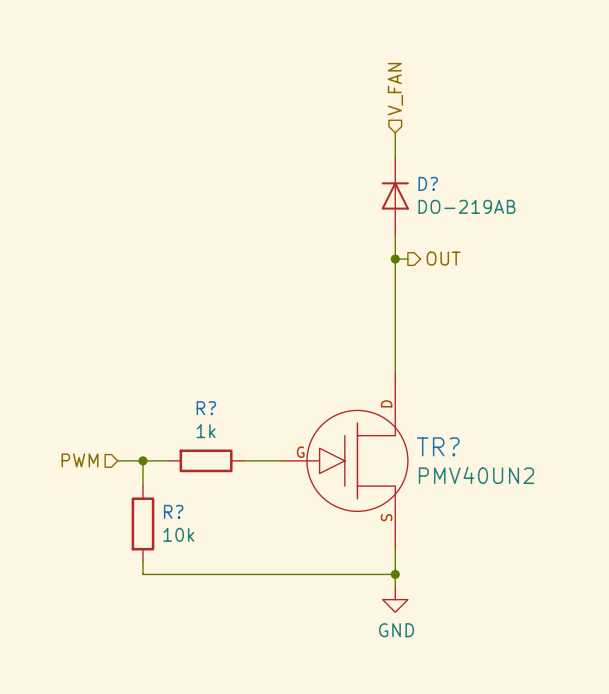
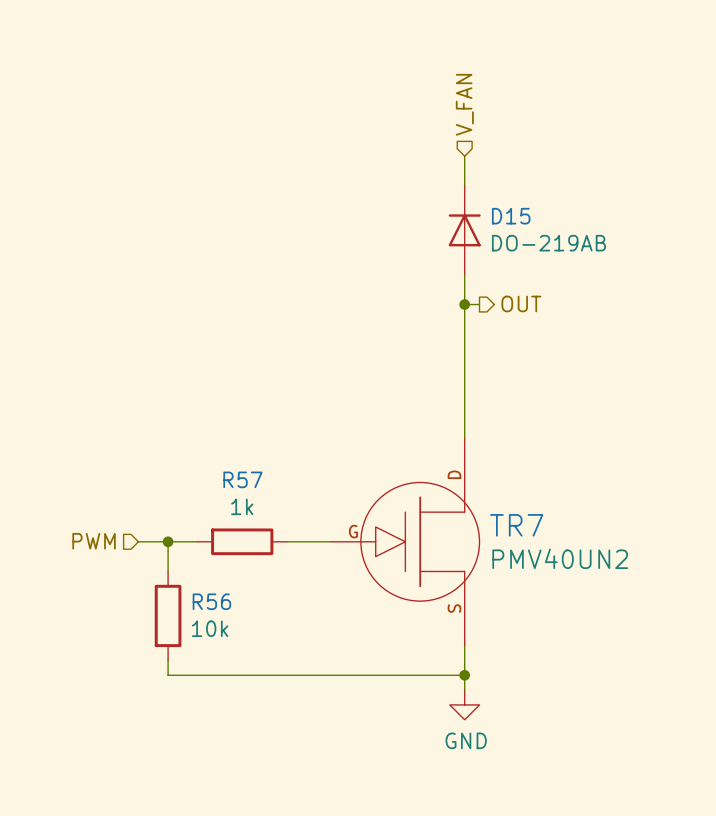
D? name: D? (428, 183) -> D15 (511, 216)
R? name: R? (206, 408) -> R57 (242, 479)
TR? name: TR? (438, 446) -> TR7 (516, 525)
R? name: R? (173, 511) -> R56 (211, 601)

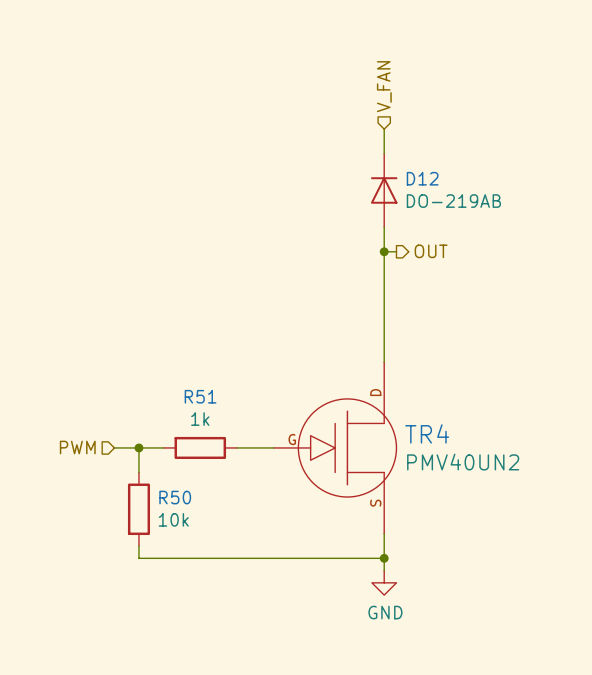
D15 name: D15 (511, 216) -> D12 (422, 178)
R57 name: R57 (242, 479) -> R51 (200, 396)
TR7 name: TR7 (516, 525) -> TR4 (427, 433)
R56 name: R56 (211, 601) -> R50 (175, 497)

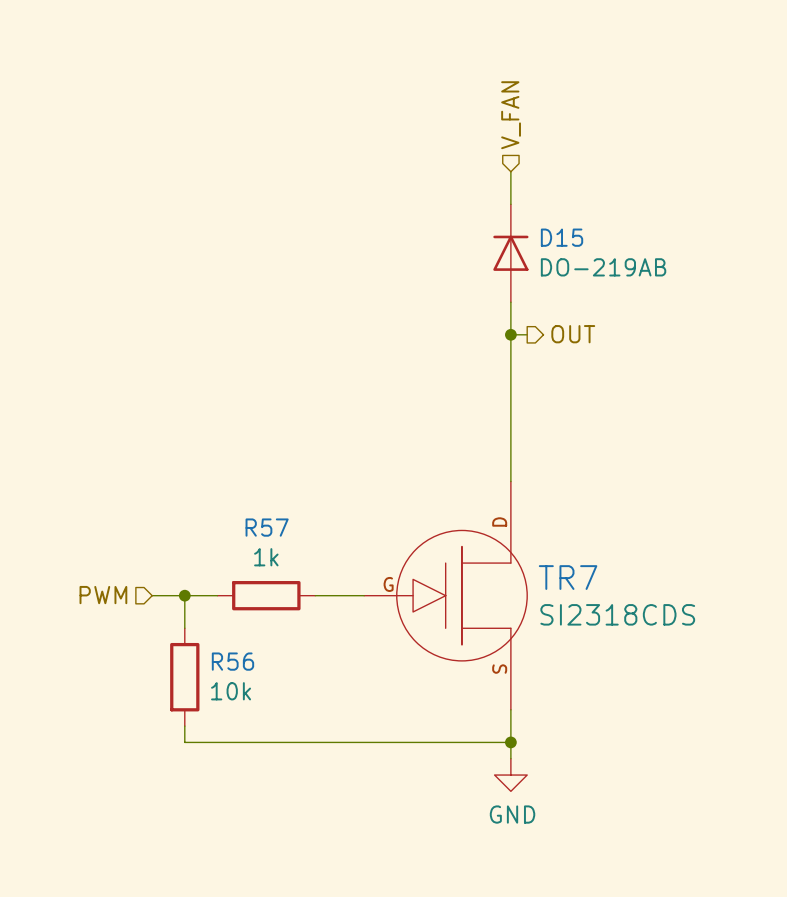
D12 name: D12 (422, 178) -> D15 (562, 237)
R51 name: R51 (200, 396) -> R57 (267, 527)
TR4 name: TR4 (427, 433) -> TR7 (568, 577)
TR4 value: PMV40UN2 (463, 462) -> SI2318CDS (617, 614)
R50 name: R50 (175, 497) -> R56 (232, 661)

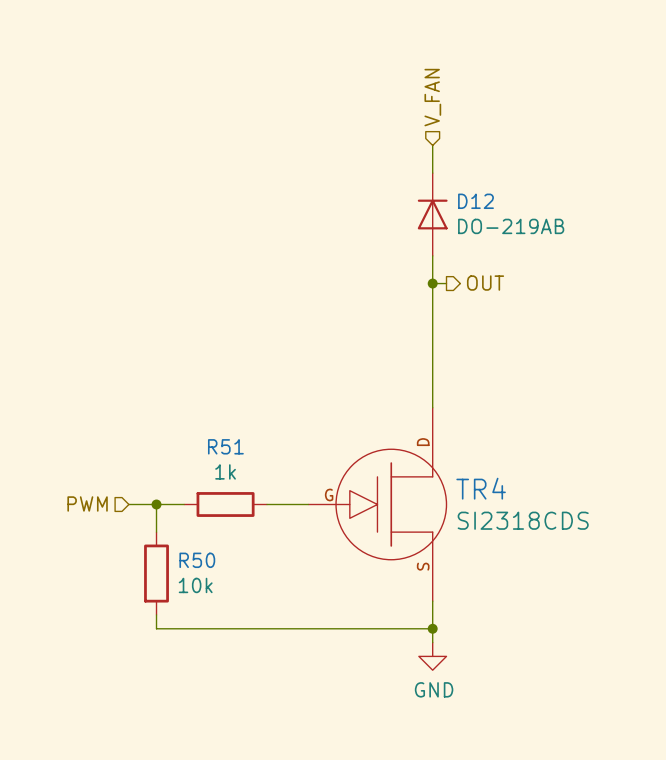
D15 name: D15 (562, 237) -> D12 (475, 201)
R57 name: R57 (267, 527) -> R51 (225, 446)
TR7 name: TR7 (568, 577) -> TR4 (481, 488)
R56 name: R56 (232, 661) -> R50 (197, 560)

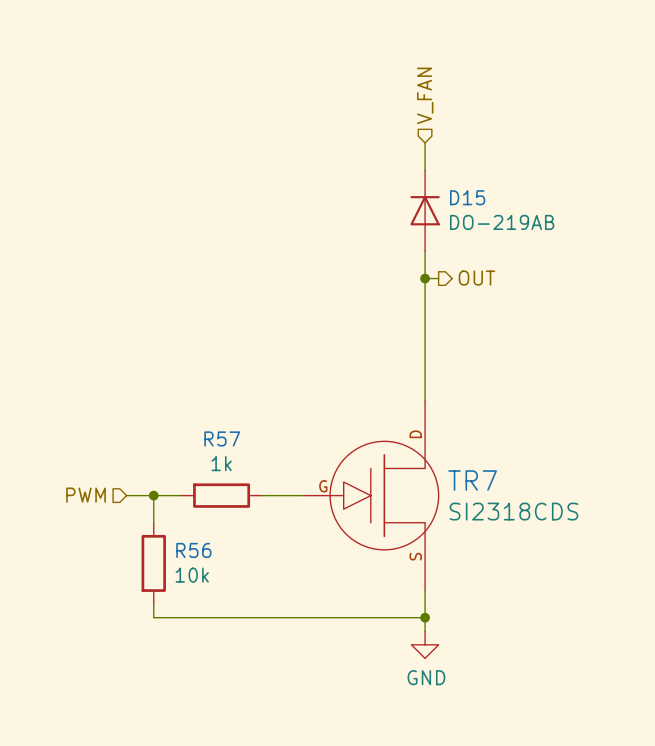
D12 name: D12 (475, 201) -> D15 (467, 197)
R51 name: R51 (225, 446) -> R57 (222, 438)
TR4 name: TR4 (481, 488) -> TR7 (472, 480)
R50 name: R50 (197, 560) -> R56 (193, 550)

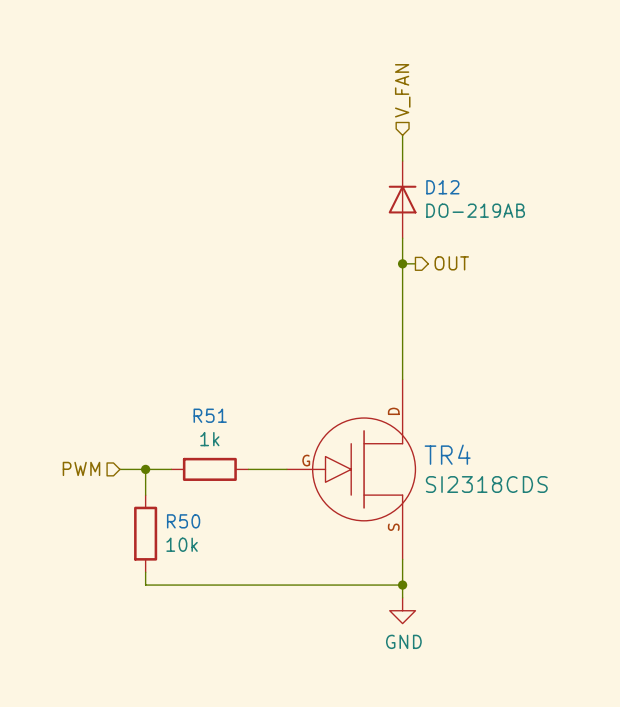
D15 name: D15 (467, 197) -> D12 (442, 187)
R57 name: R57 (222, 438) -> R51 (210, 415)
TR7 name: TR7 (472, 480) -> TR4 (447, 454)
R56 name: R56 (193, 550) -> R50 (183, 521)

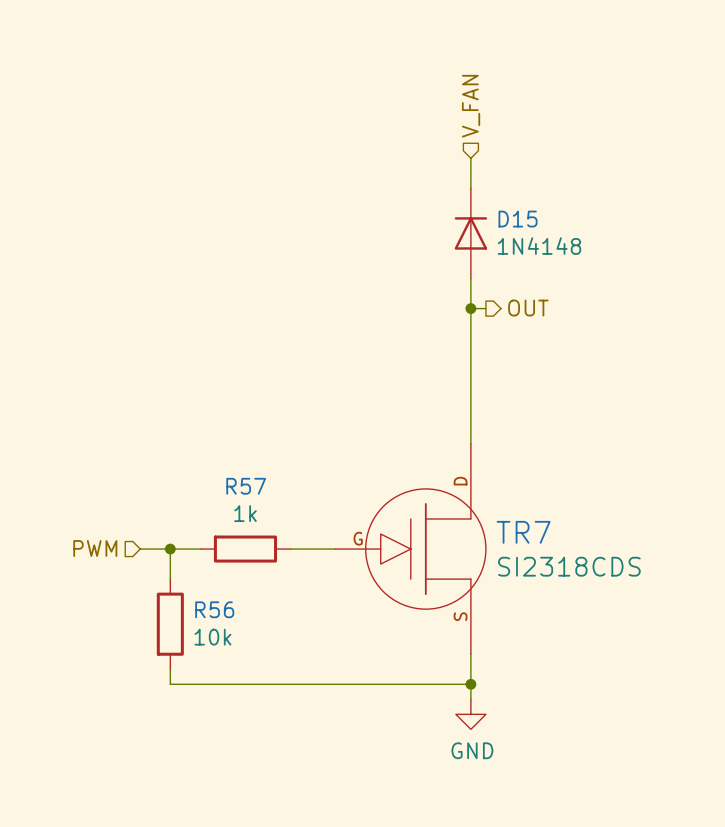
D12 name: D12 (442, 187) -> D15 (518, 219)
D12 value: DO-219AB (475, 210) -> 1N4148 (539, 246)
R51 name: R51 (210, 415) -> R57 (246, 486)
TR4 name: TR4 (447, 454) -> TR7 (523, 532)
R50 name: R50 (183, 521) -> R56 (214, 609)

